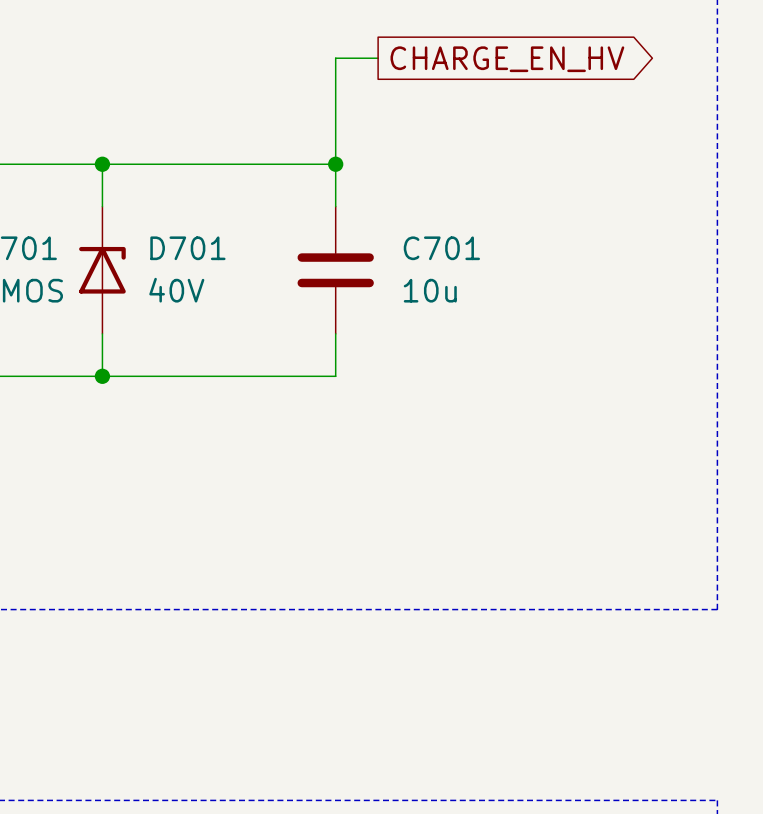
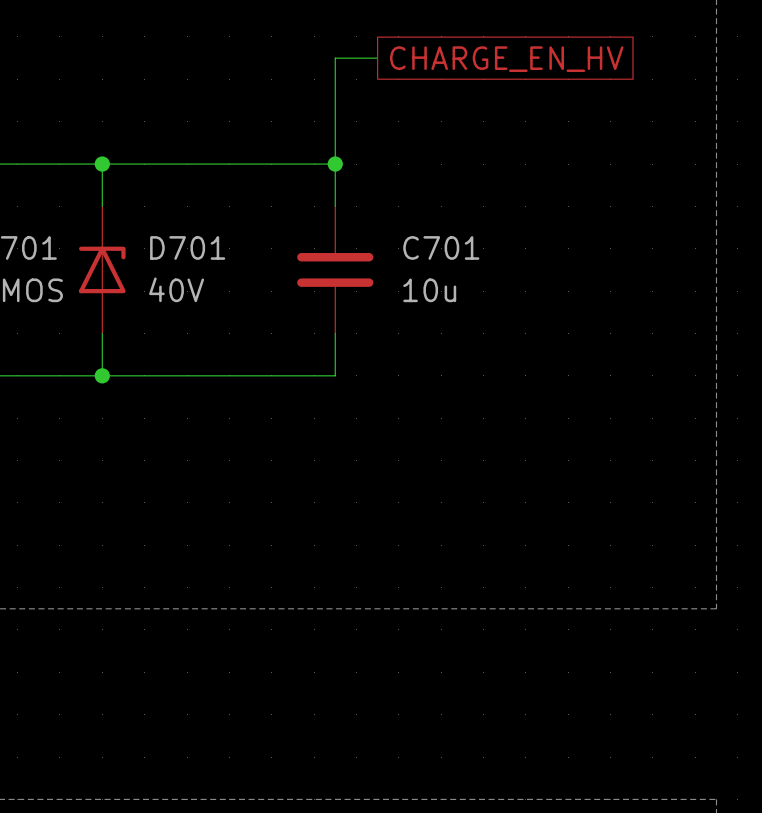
global label shape: output (507, 59) -> passive (506, 59)

